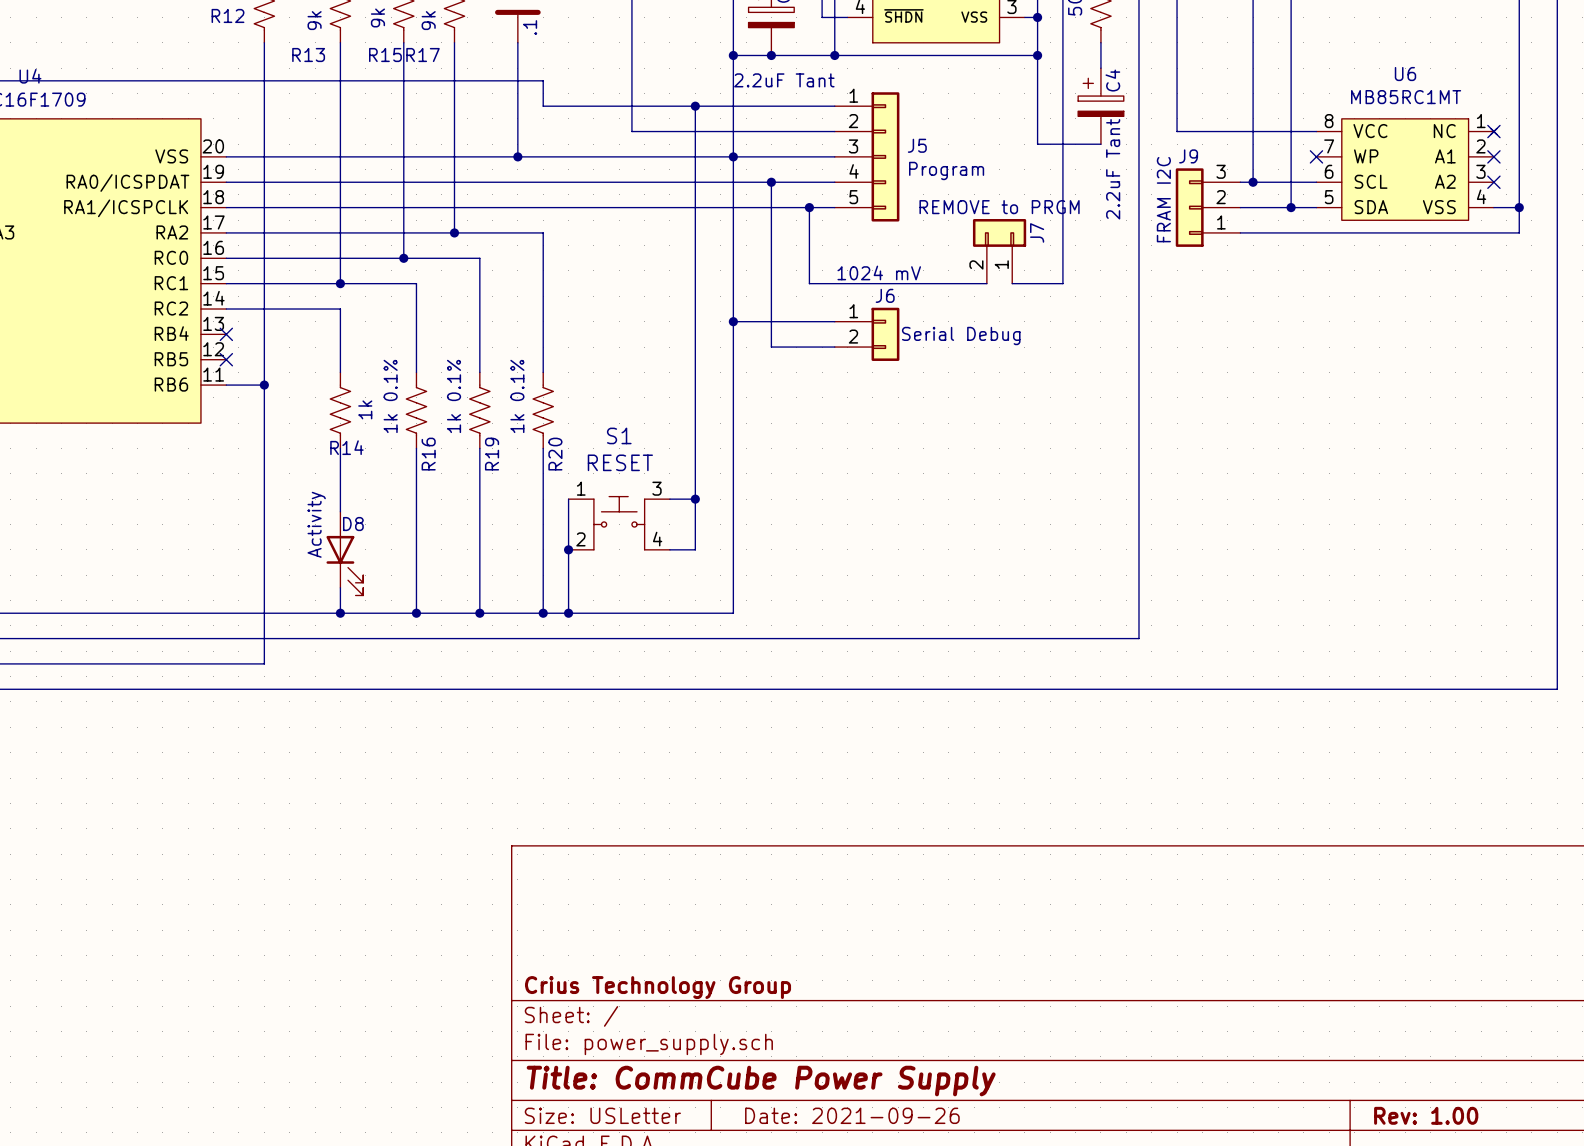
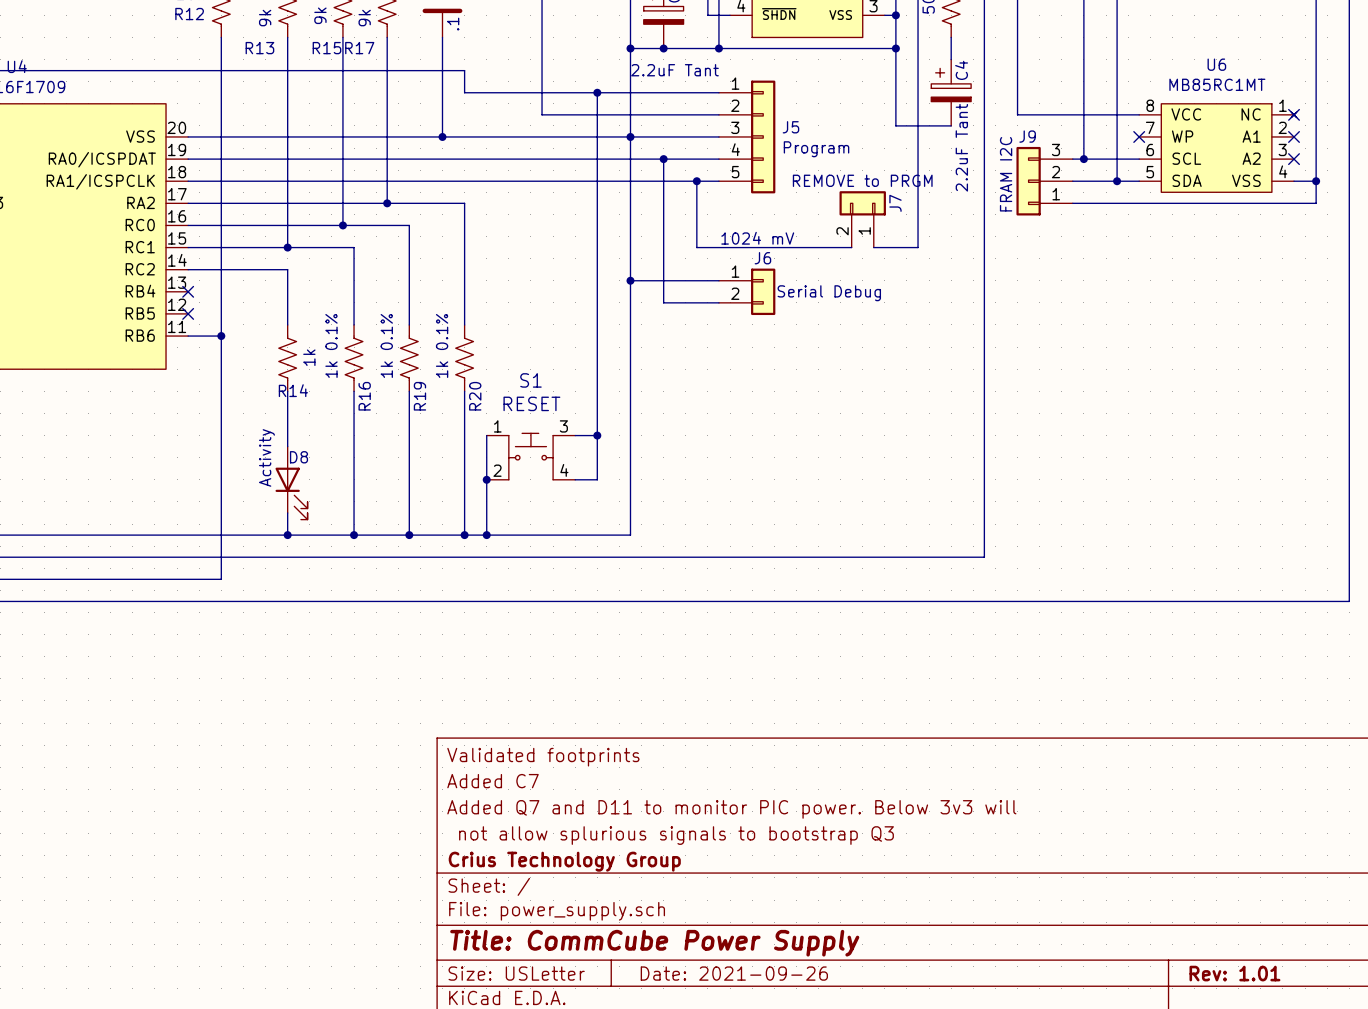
title block: none -> Validated footprints (543, 757)
title block: none -> Added C7 (493, 781)
title block: none -> Added Q7 and D11 to monitor PIC power. Below 3v3 will (731, 809)
title block: none -> not allow splurious signals to bootstrap Q3 (676, 835)
title block: Rev: 1.00 (1426, 1115) -> Rev: 1.01 (1234, 973)

